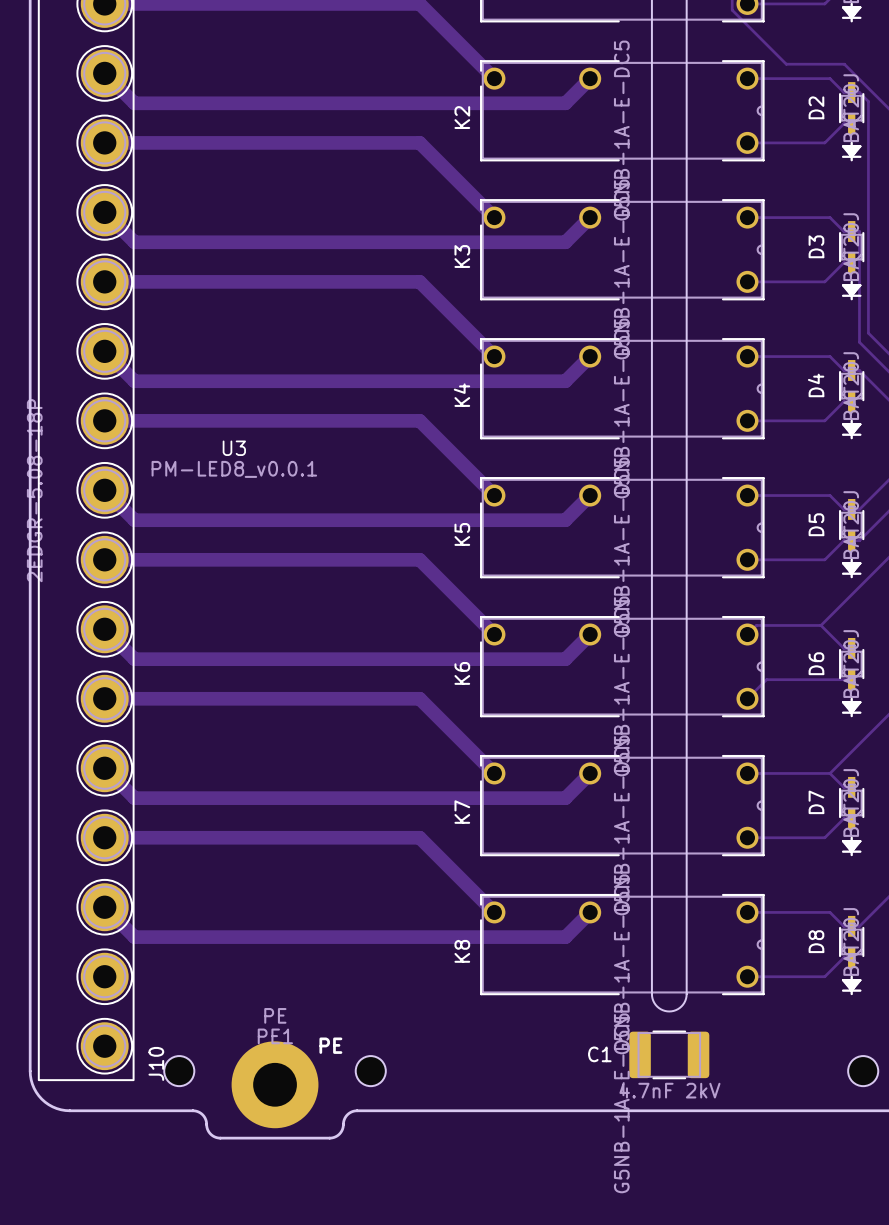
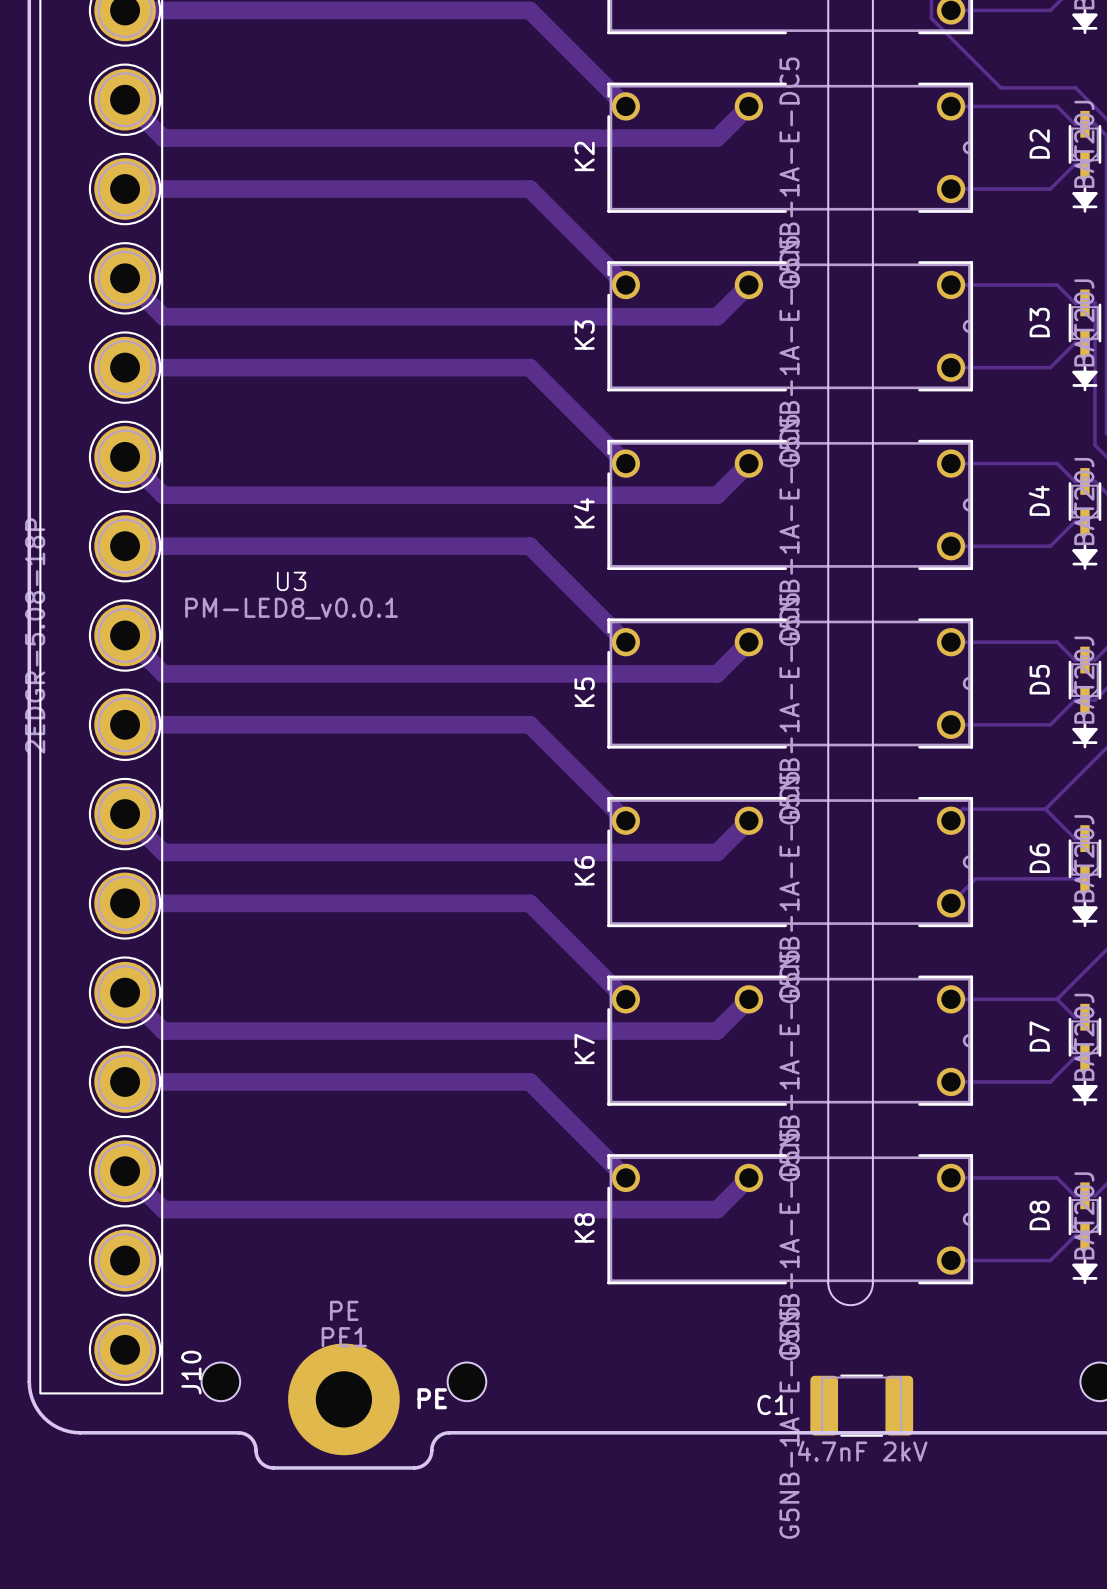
text position: PE (330, 1045) -> PE (432, 1398)
C1 position: (669, 1054) -> (861, 1405)

